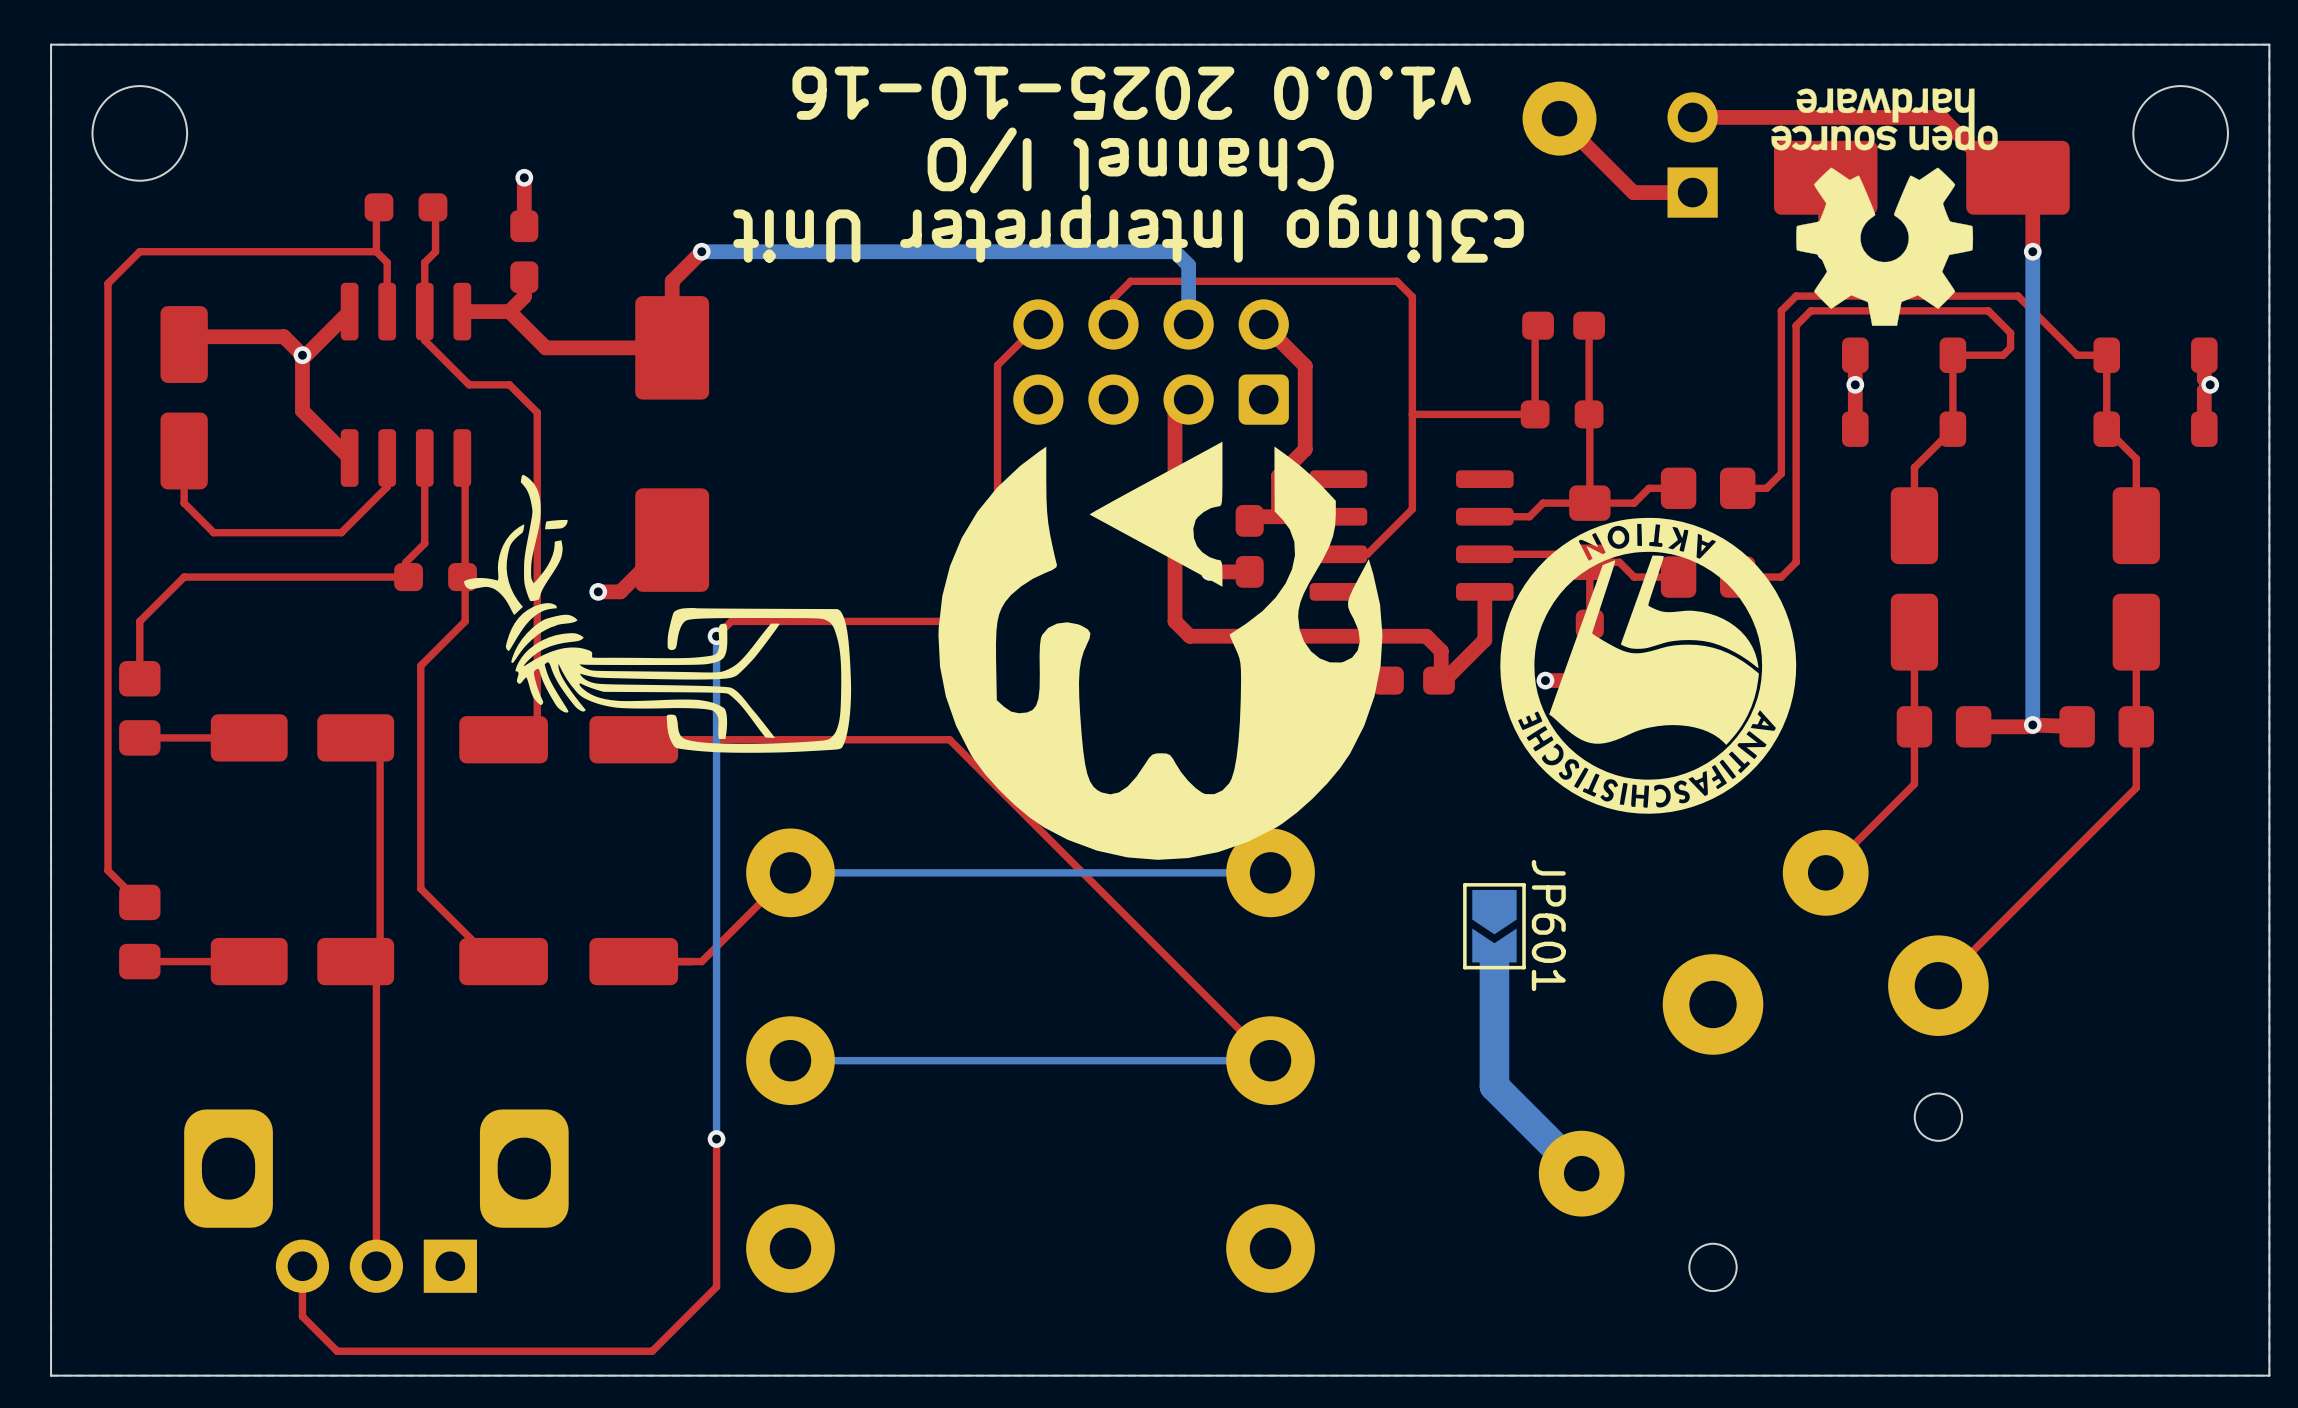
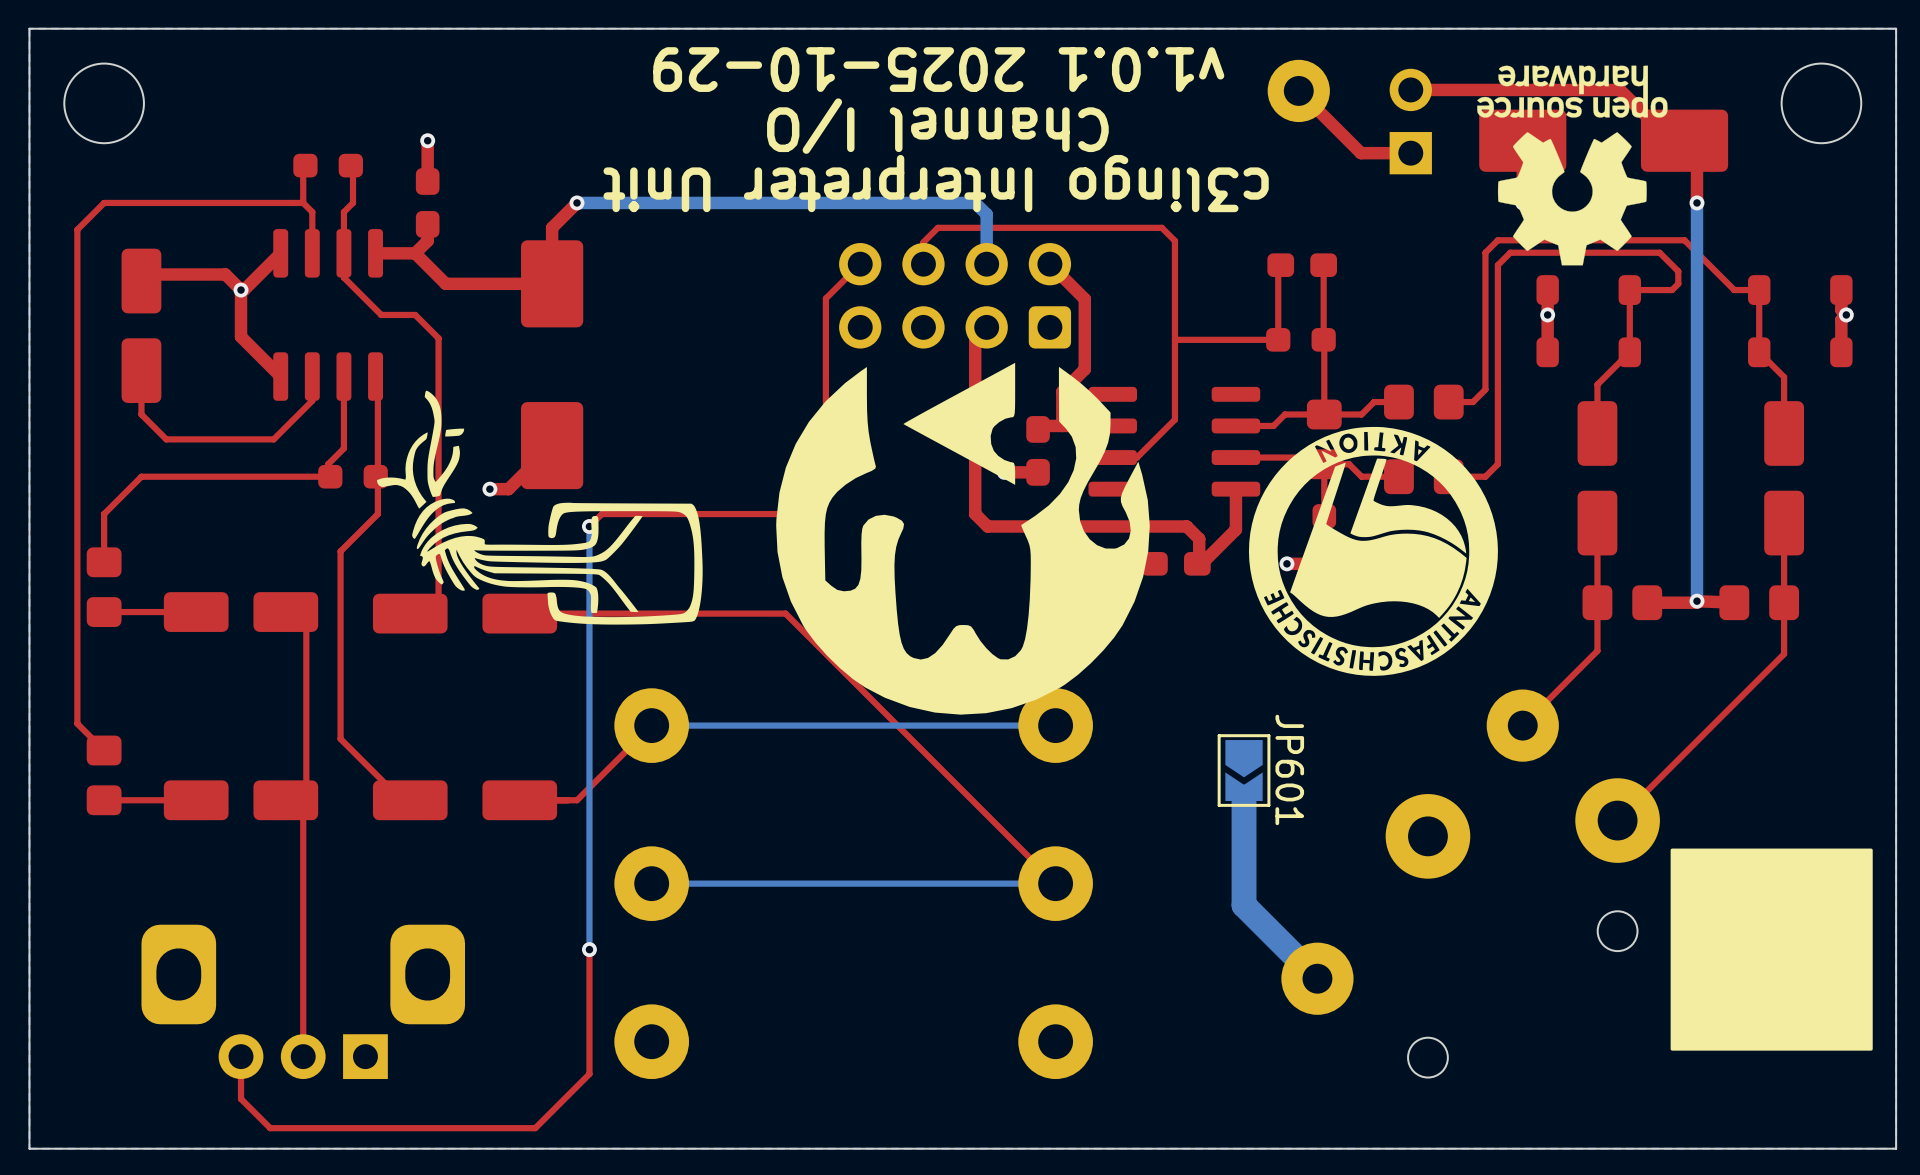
text: v1.0.0 2025-10-16 (1131, 93) -> v1.0.1 2025-10-29 (938, 69)
drawing: none -> [1670, 848, 1873, 1051]

